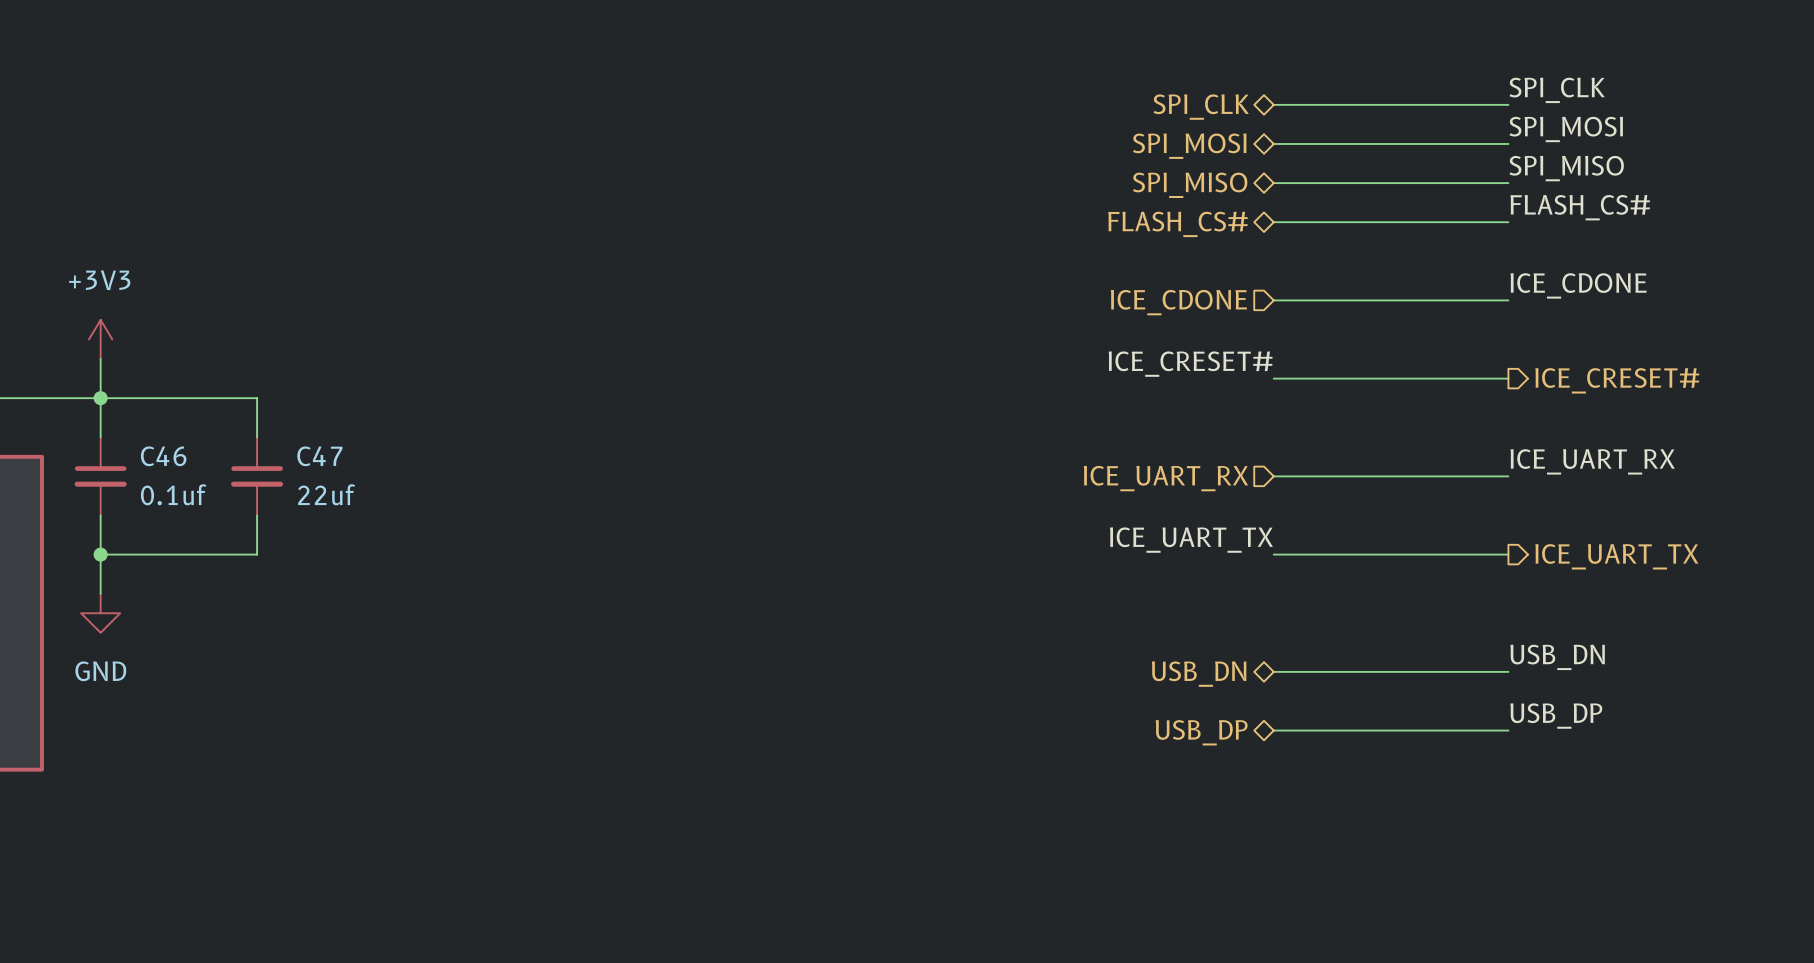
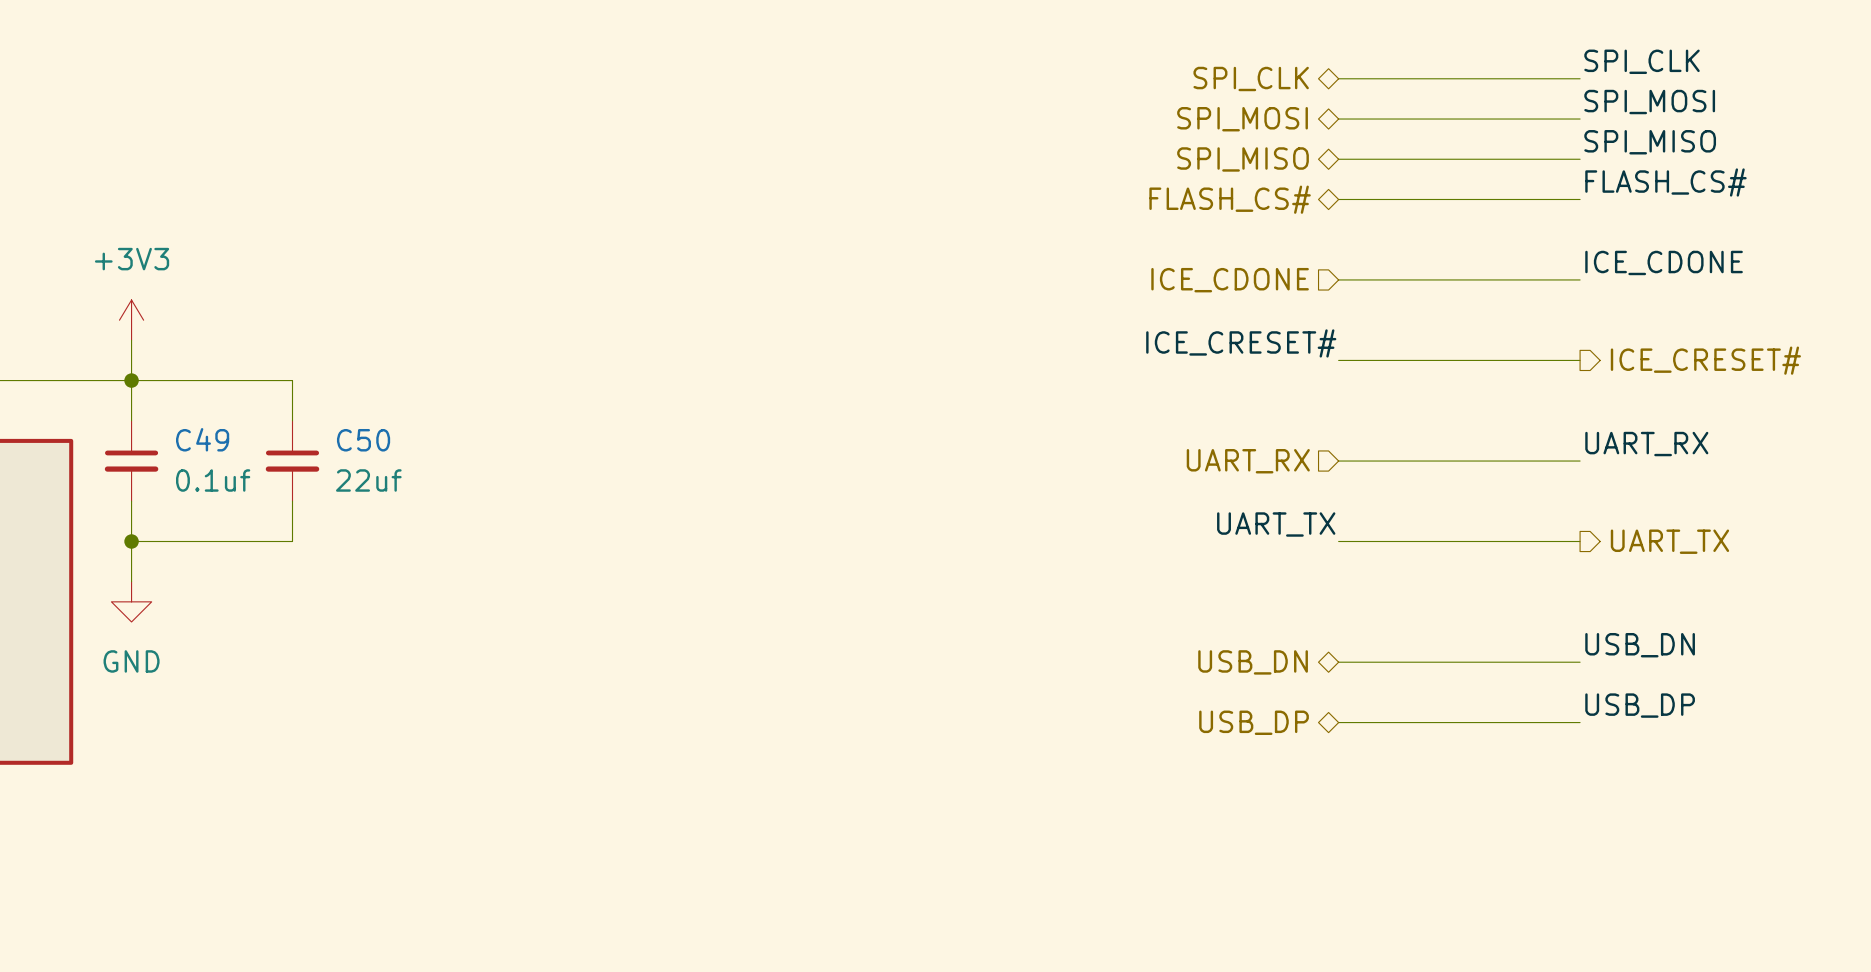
C46 name: C46 (163, 456) -> C49 (202, 439)
C47 name: C47 (319, 456) -> C50 (363, 440)
label: ICE_UART_RX (1592, 461) -> UART_RX (1646, 444)
hierarchical label: ICE_UART_RX (1165, 478) -> UART_RX (1248, 461)
label: ICE_UART_TX (1191, 540) -> UART_TX (1276, 524)
hierarchical label: ICE_UART_TX (1616, 556) -> UART_TX (1669, 541)

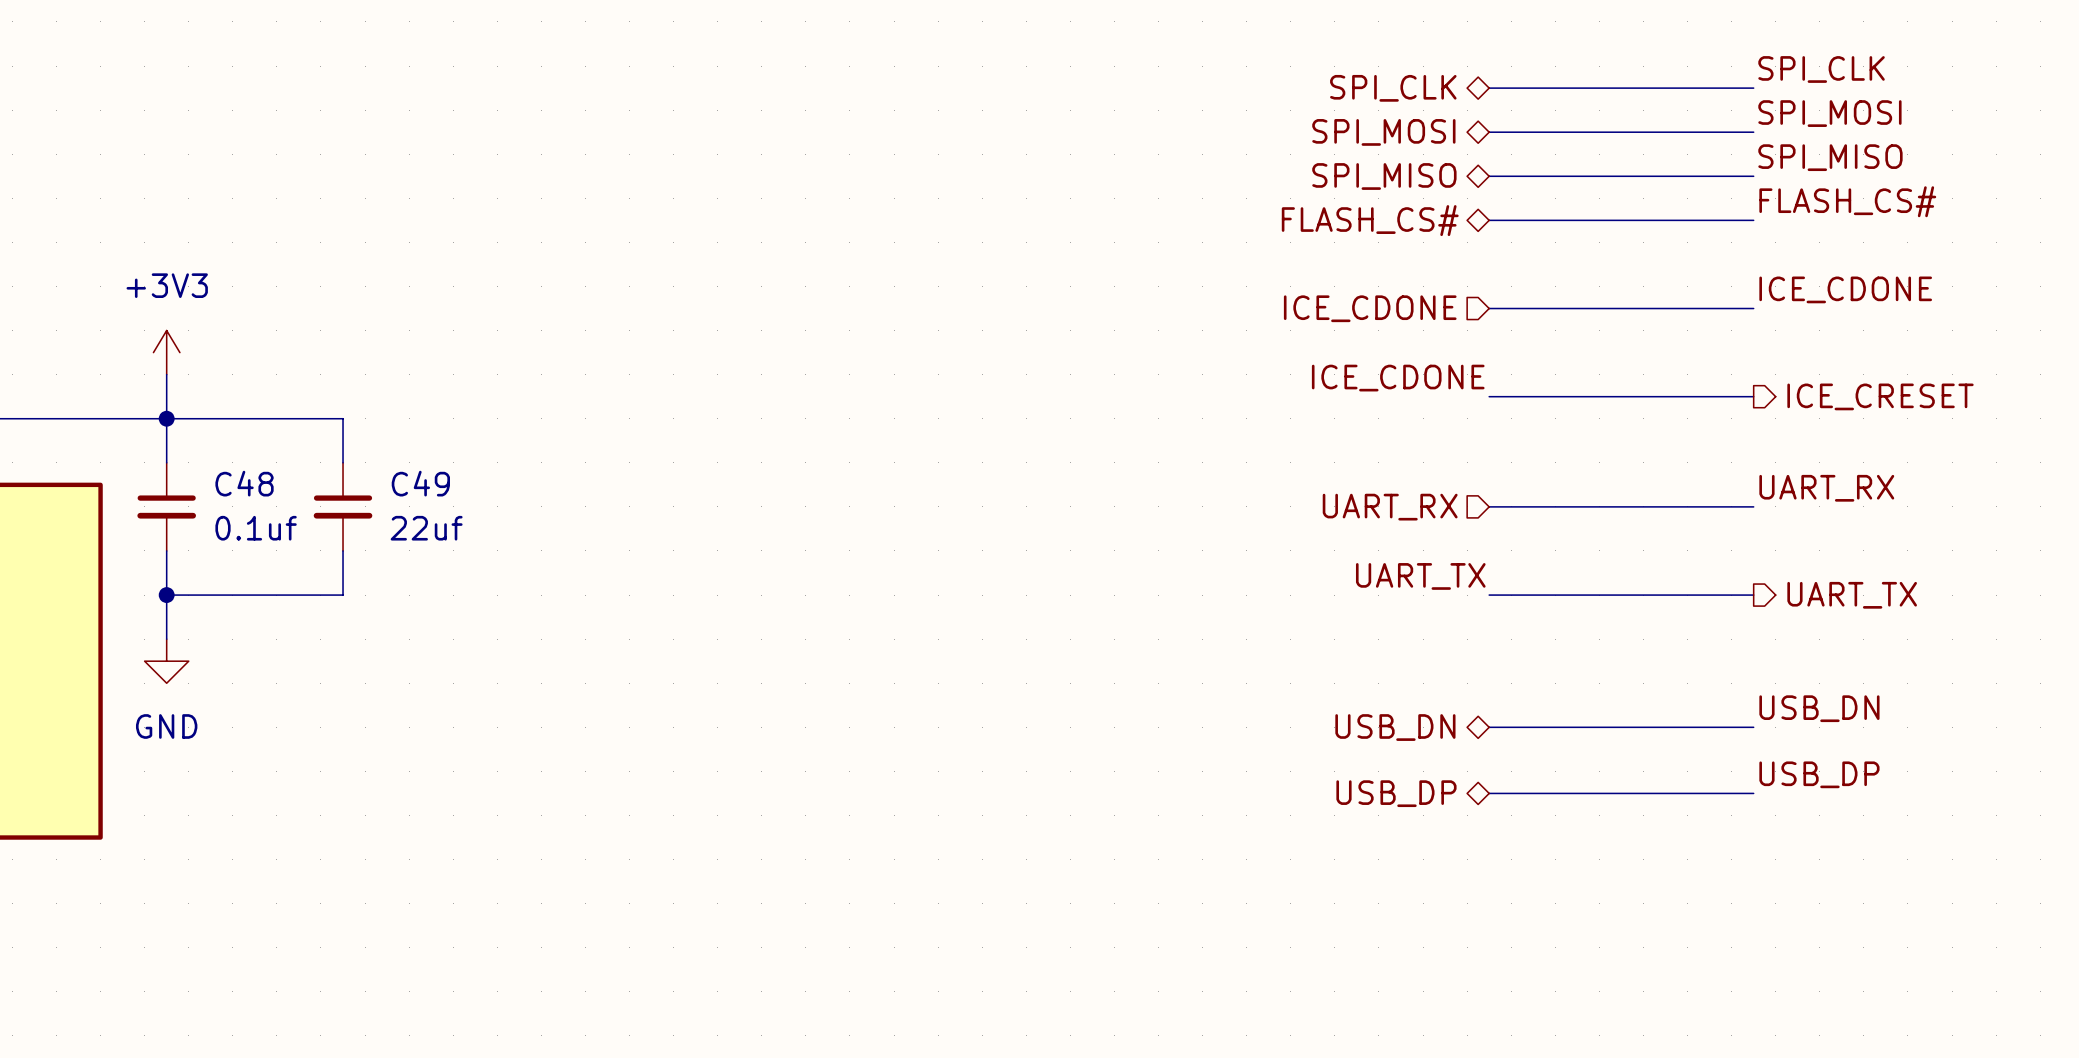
label: ICE_CRESET# (1241, 343) -> ICE_CDONE (1398, 378)
hierarchical label: ICE_CRESET# (1705, 360) -> ICE_CRESET (1880, 396)
C49 name: C49 (202, 439) -> C48 (244, 483)
C50 name: C50 (363, 440) -> C49 (420, 483)

